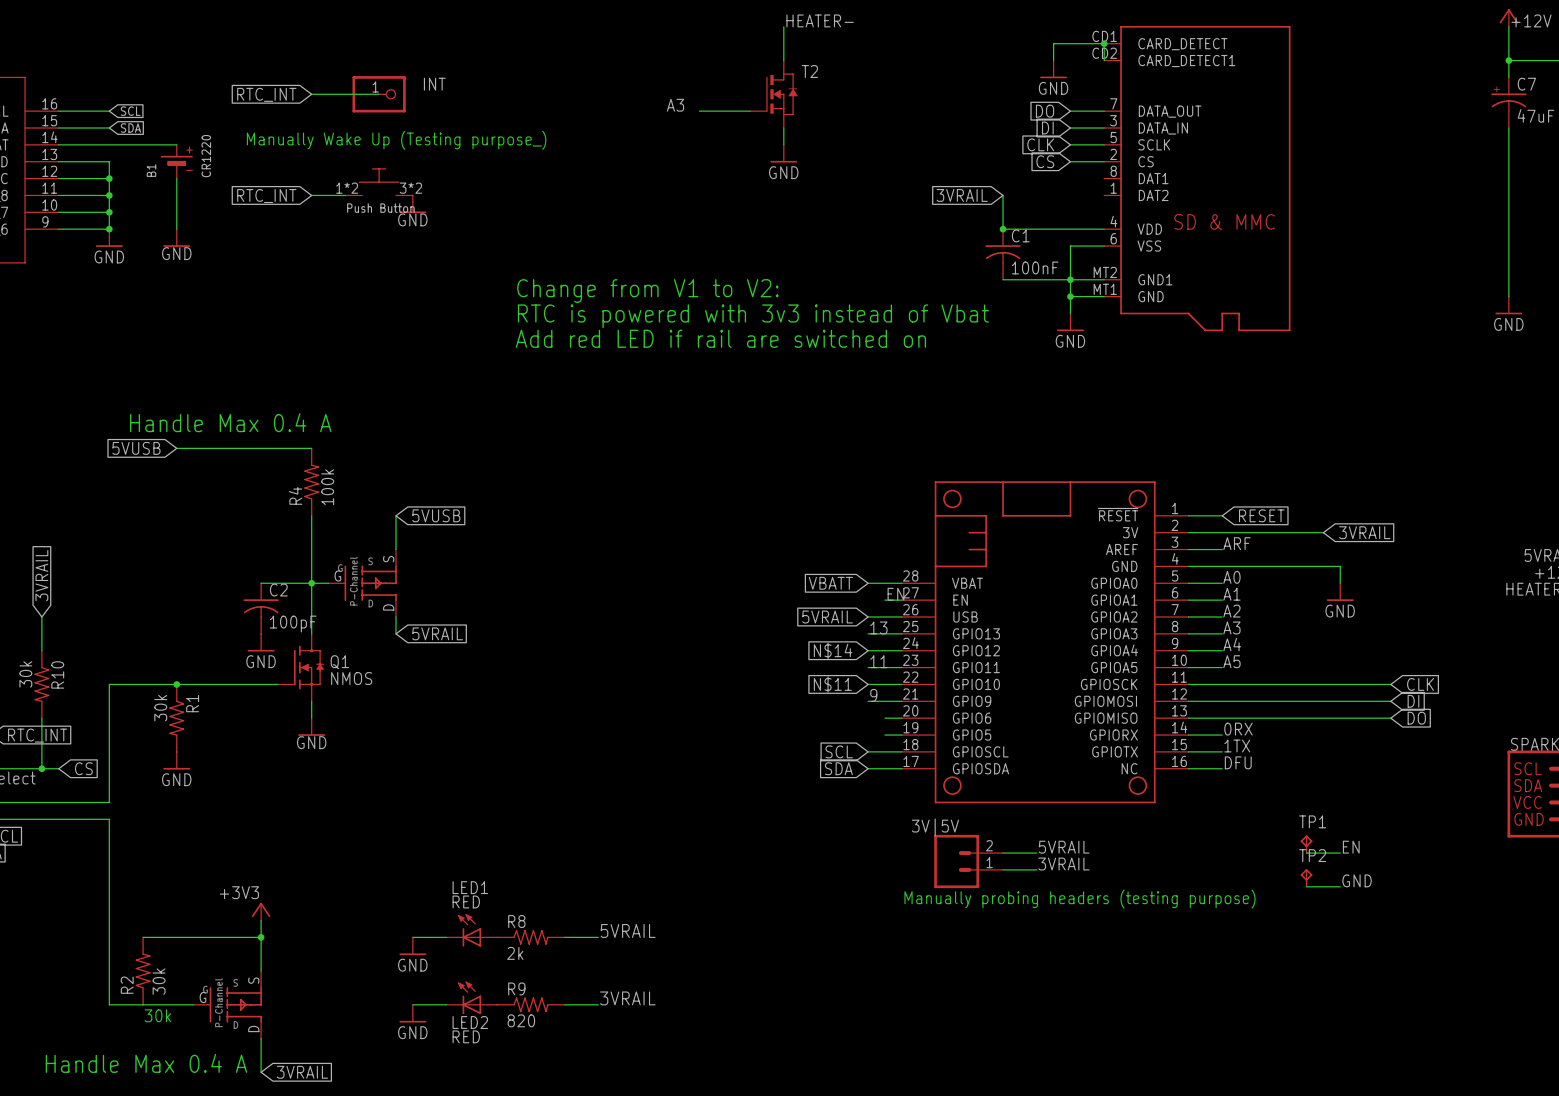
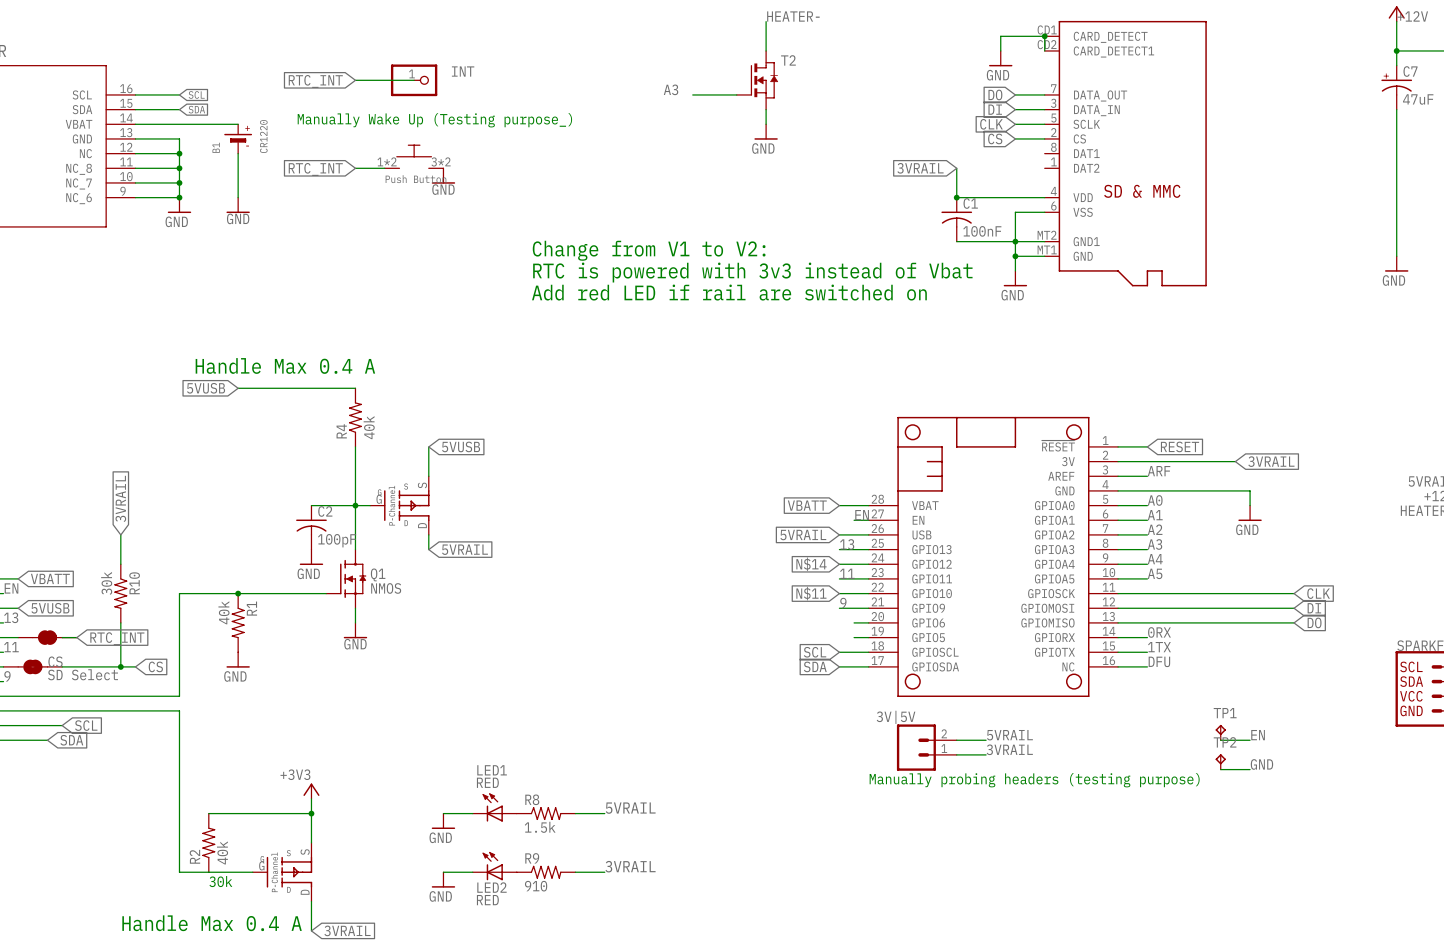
R4 value: 100k (327, 487) -> 40k (369, 427)
R1 value: 30k (160, 708) -> 40k (223, 612)
R8 value: 2k (515, 953) -> 1.5k (540, 827)
R2 value: 30k (159, 981) -> 40k (222, 852)
R9 value: 820 (521, 1020) -> 910 (536, 886)

